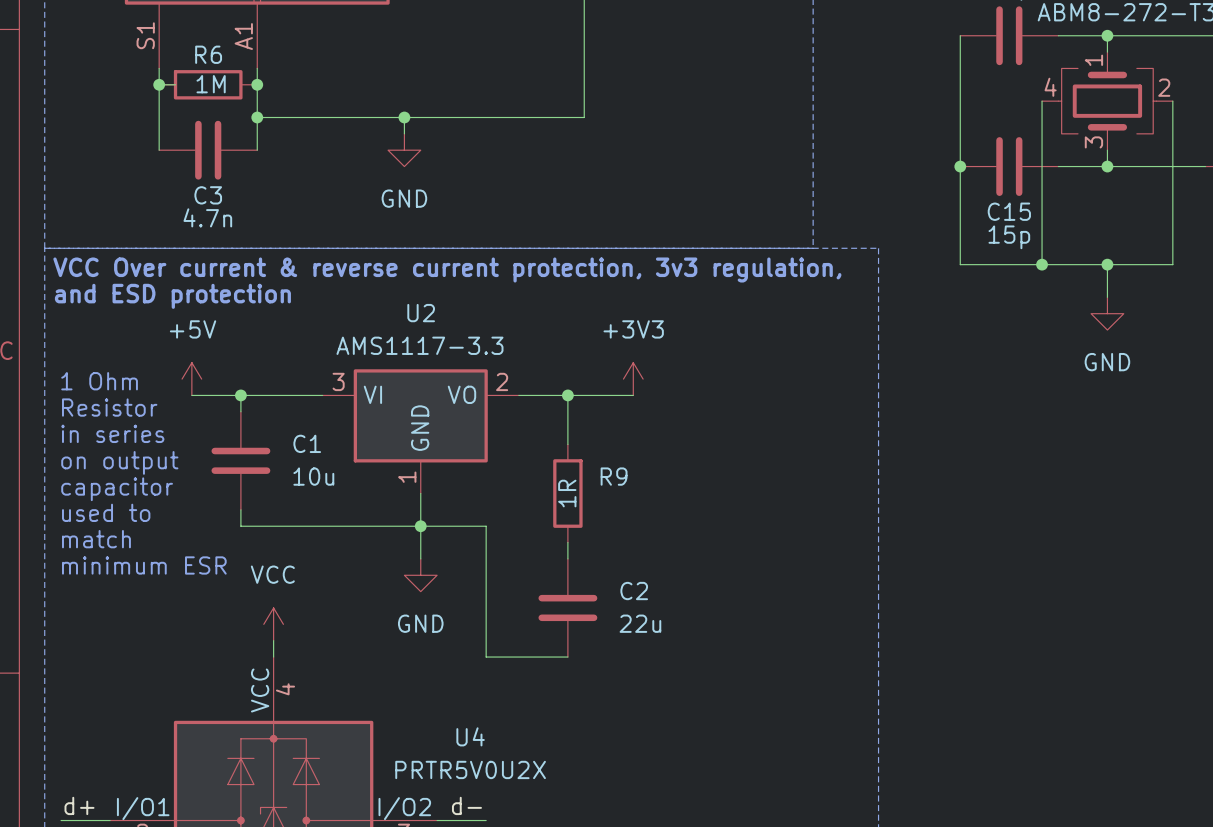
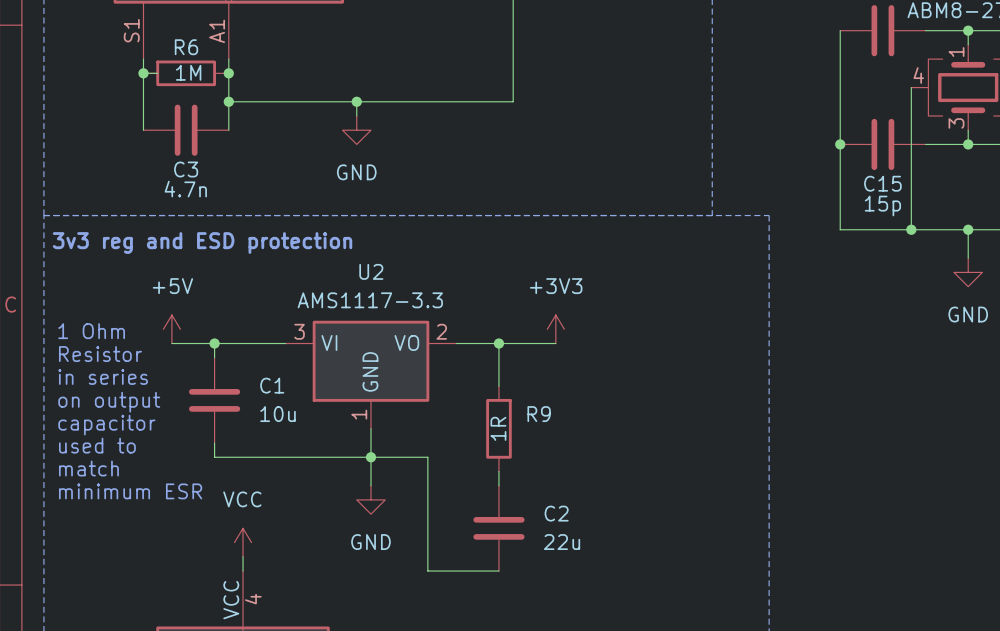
text: VCC Over current & reverse current protection, 3v3 regulation, (447, 269) -> none
text: and ESD protection (172, 296) -> 3v3 reg and ESD protection (202, 243)

